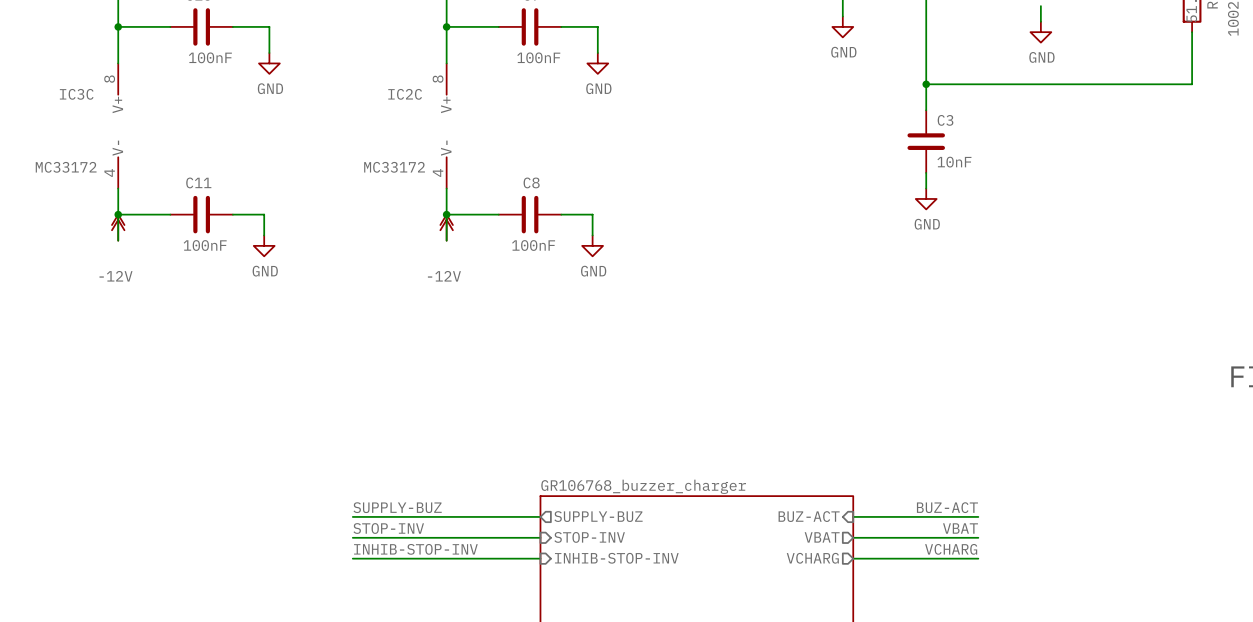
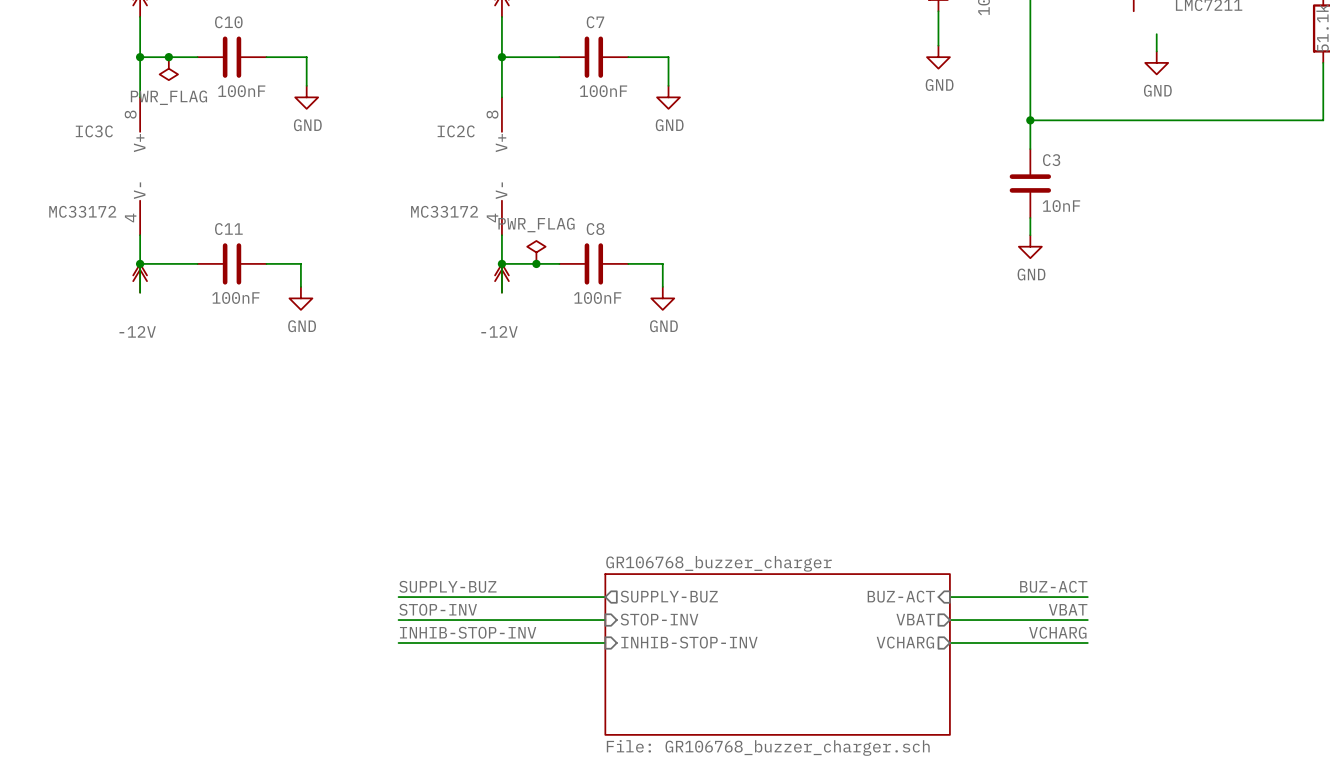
junction: none -> (168, 57)
power symbol: none -> PWR_FLAG (168, 68)
power symbol: none -> PWR_FLAG (536, 252)
junction: none -> (536, 263)

